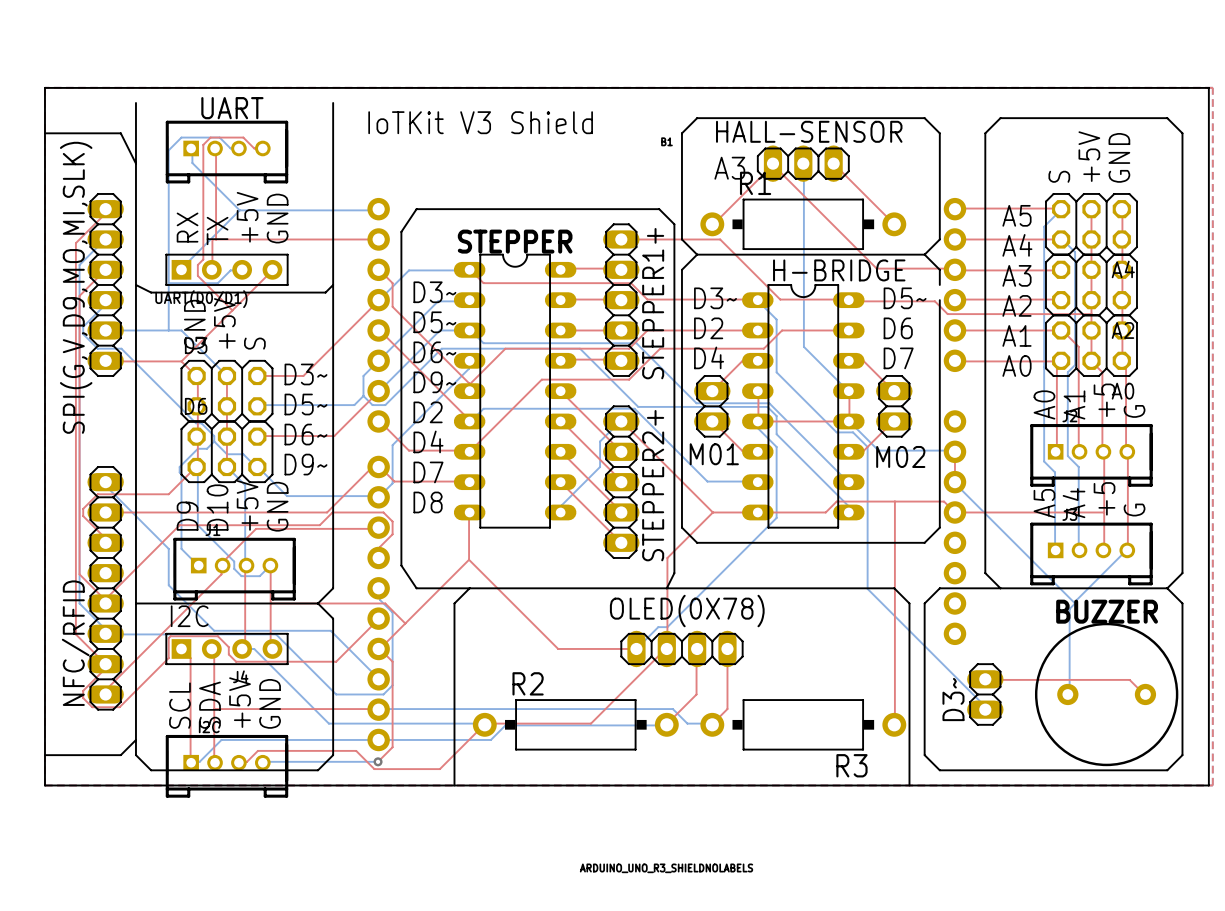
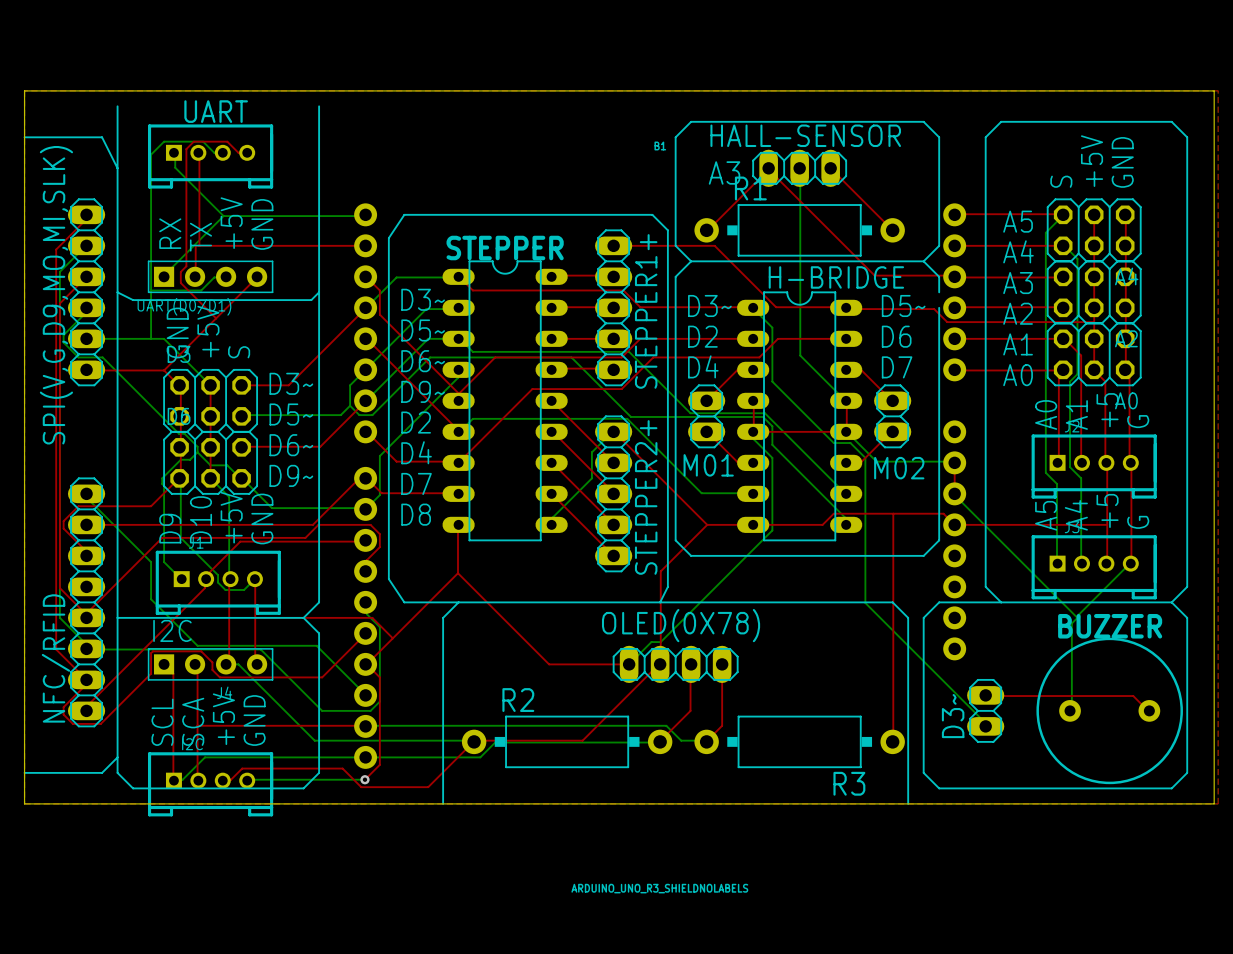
text: IoTKit V3 Shield (480, 122) -> none
SPI(G,V,D9,MO,MI,SLK) name: SPI(G,V,D9,MO,MI,SLK) (76, 287) -> SPI(V,G,D9,MO,MI,SLK) (56, 295)
text: SDA (209, 705) -> SCA (193, 721)

